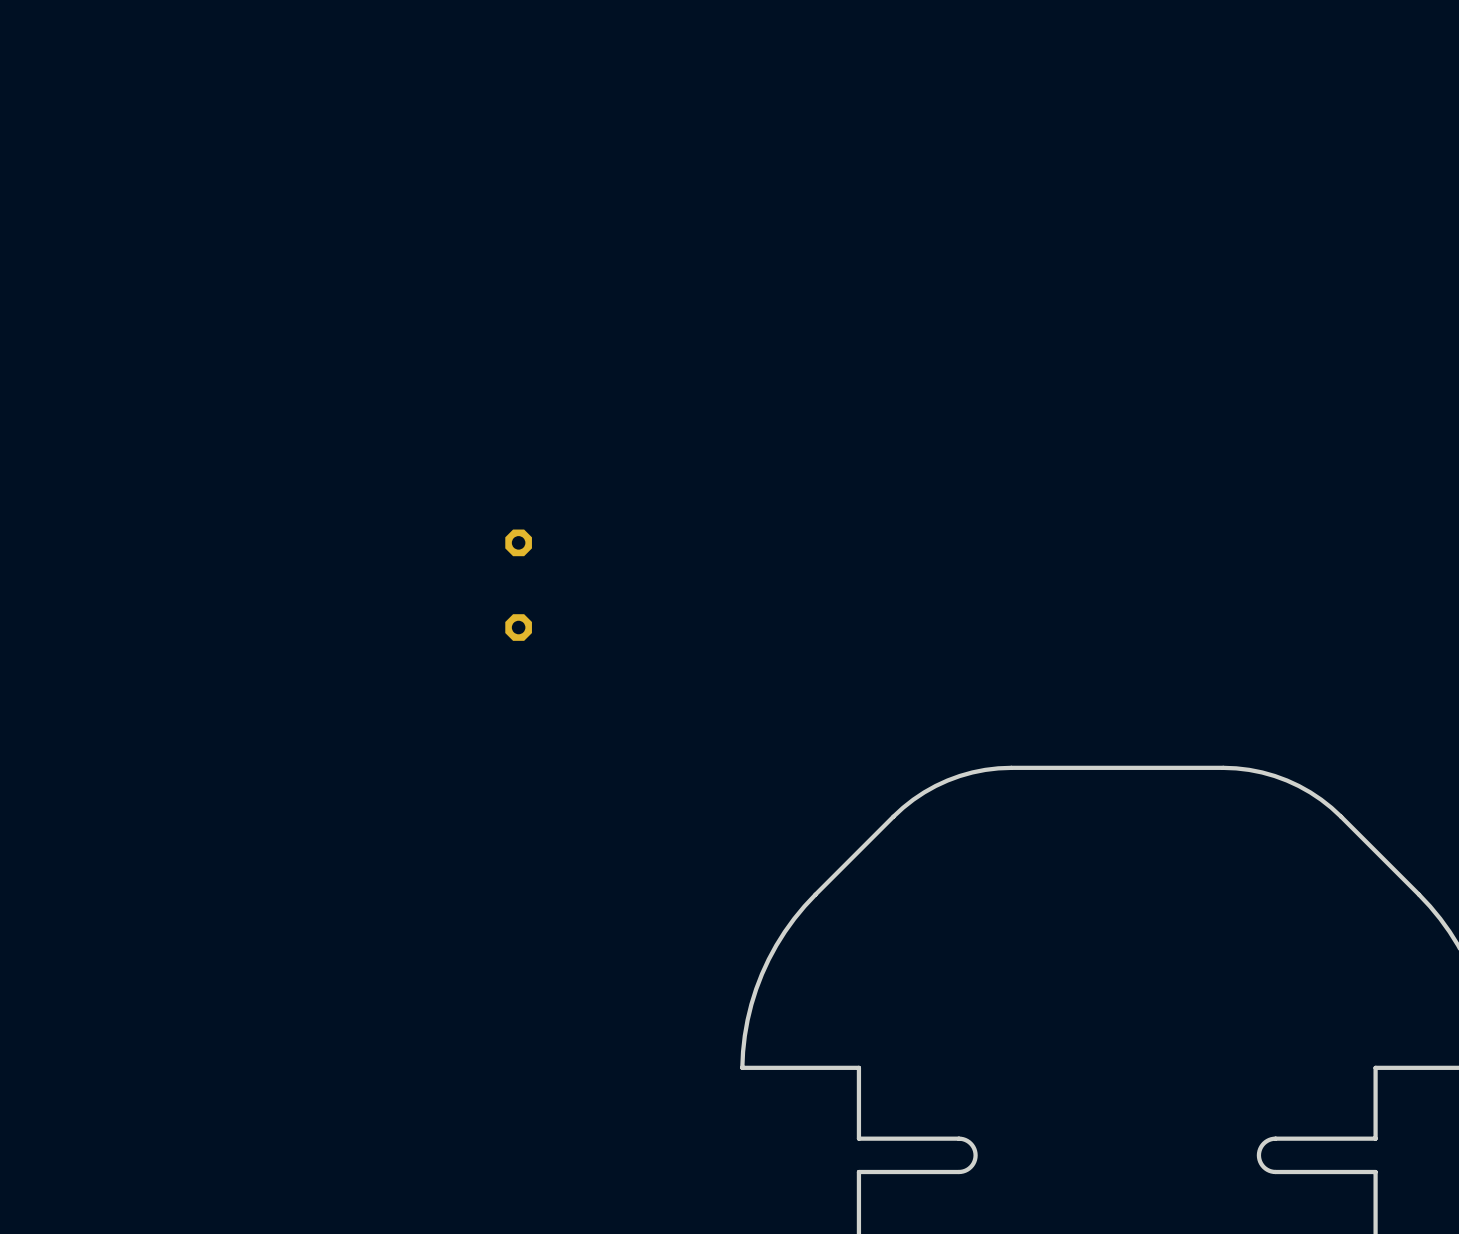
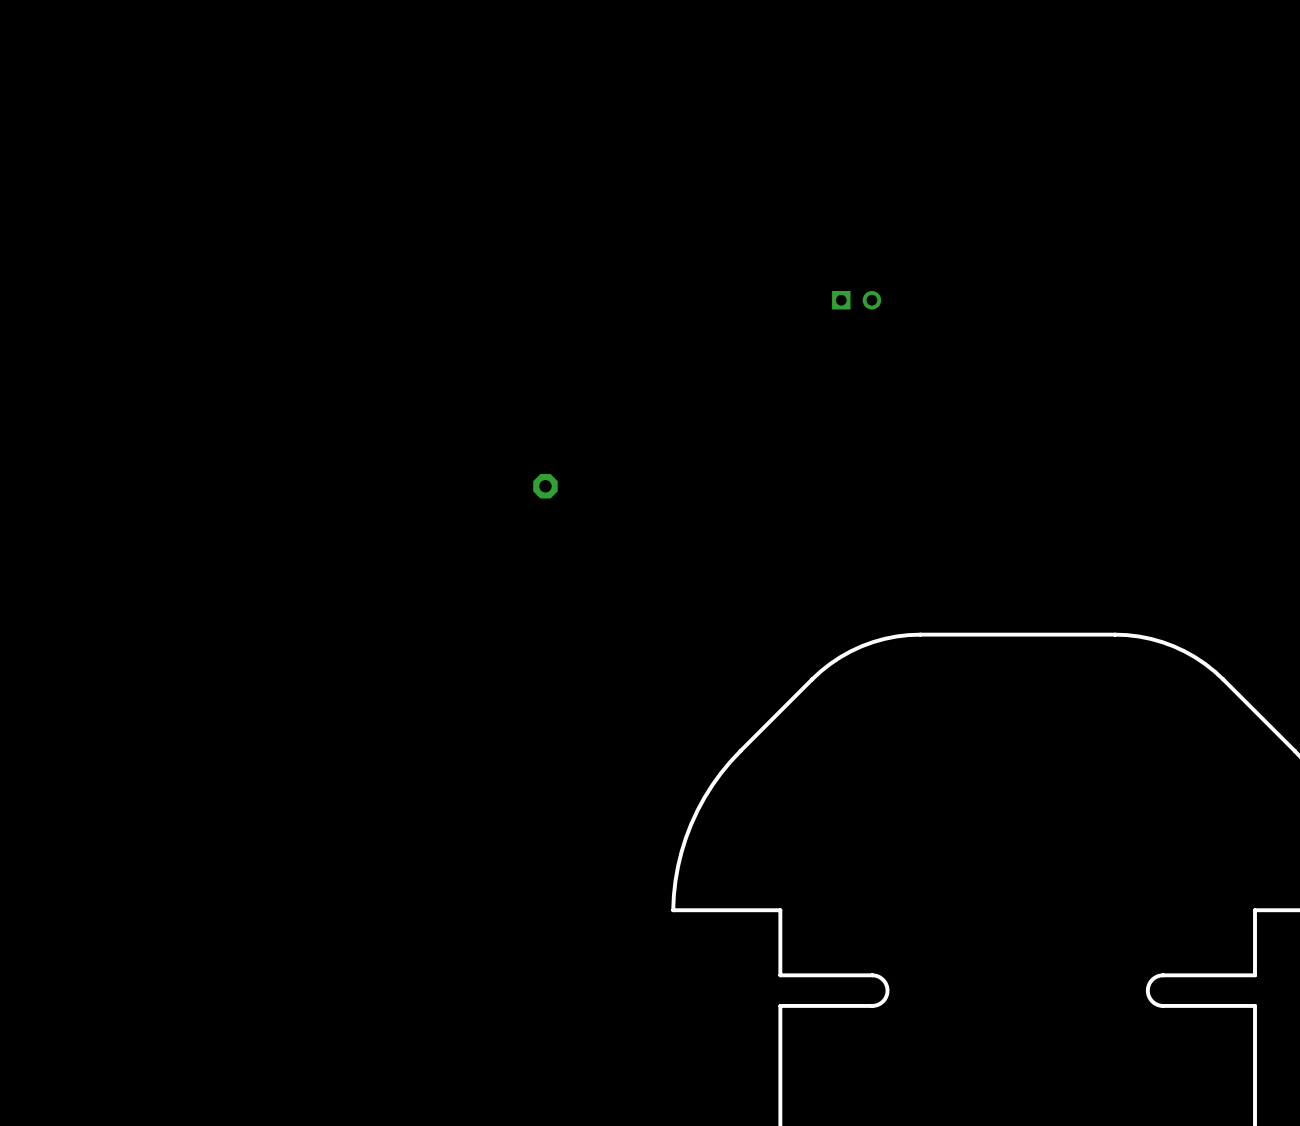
part: none -> (856, 300)
part: (518, 542) -> none
part: none -> (545, 486)
part: (518, 627) -> none

